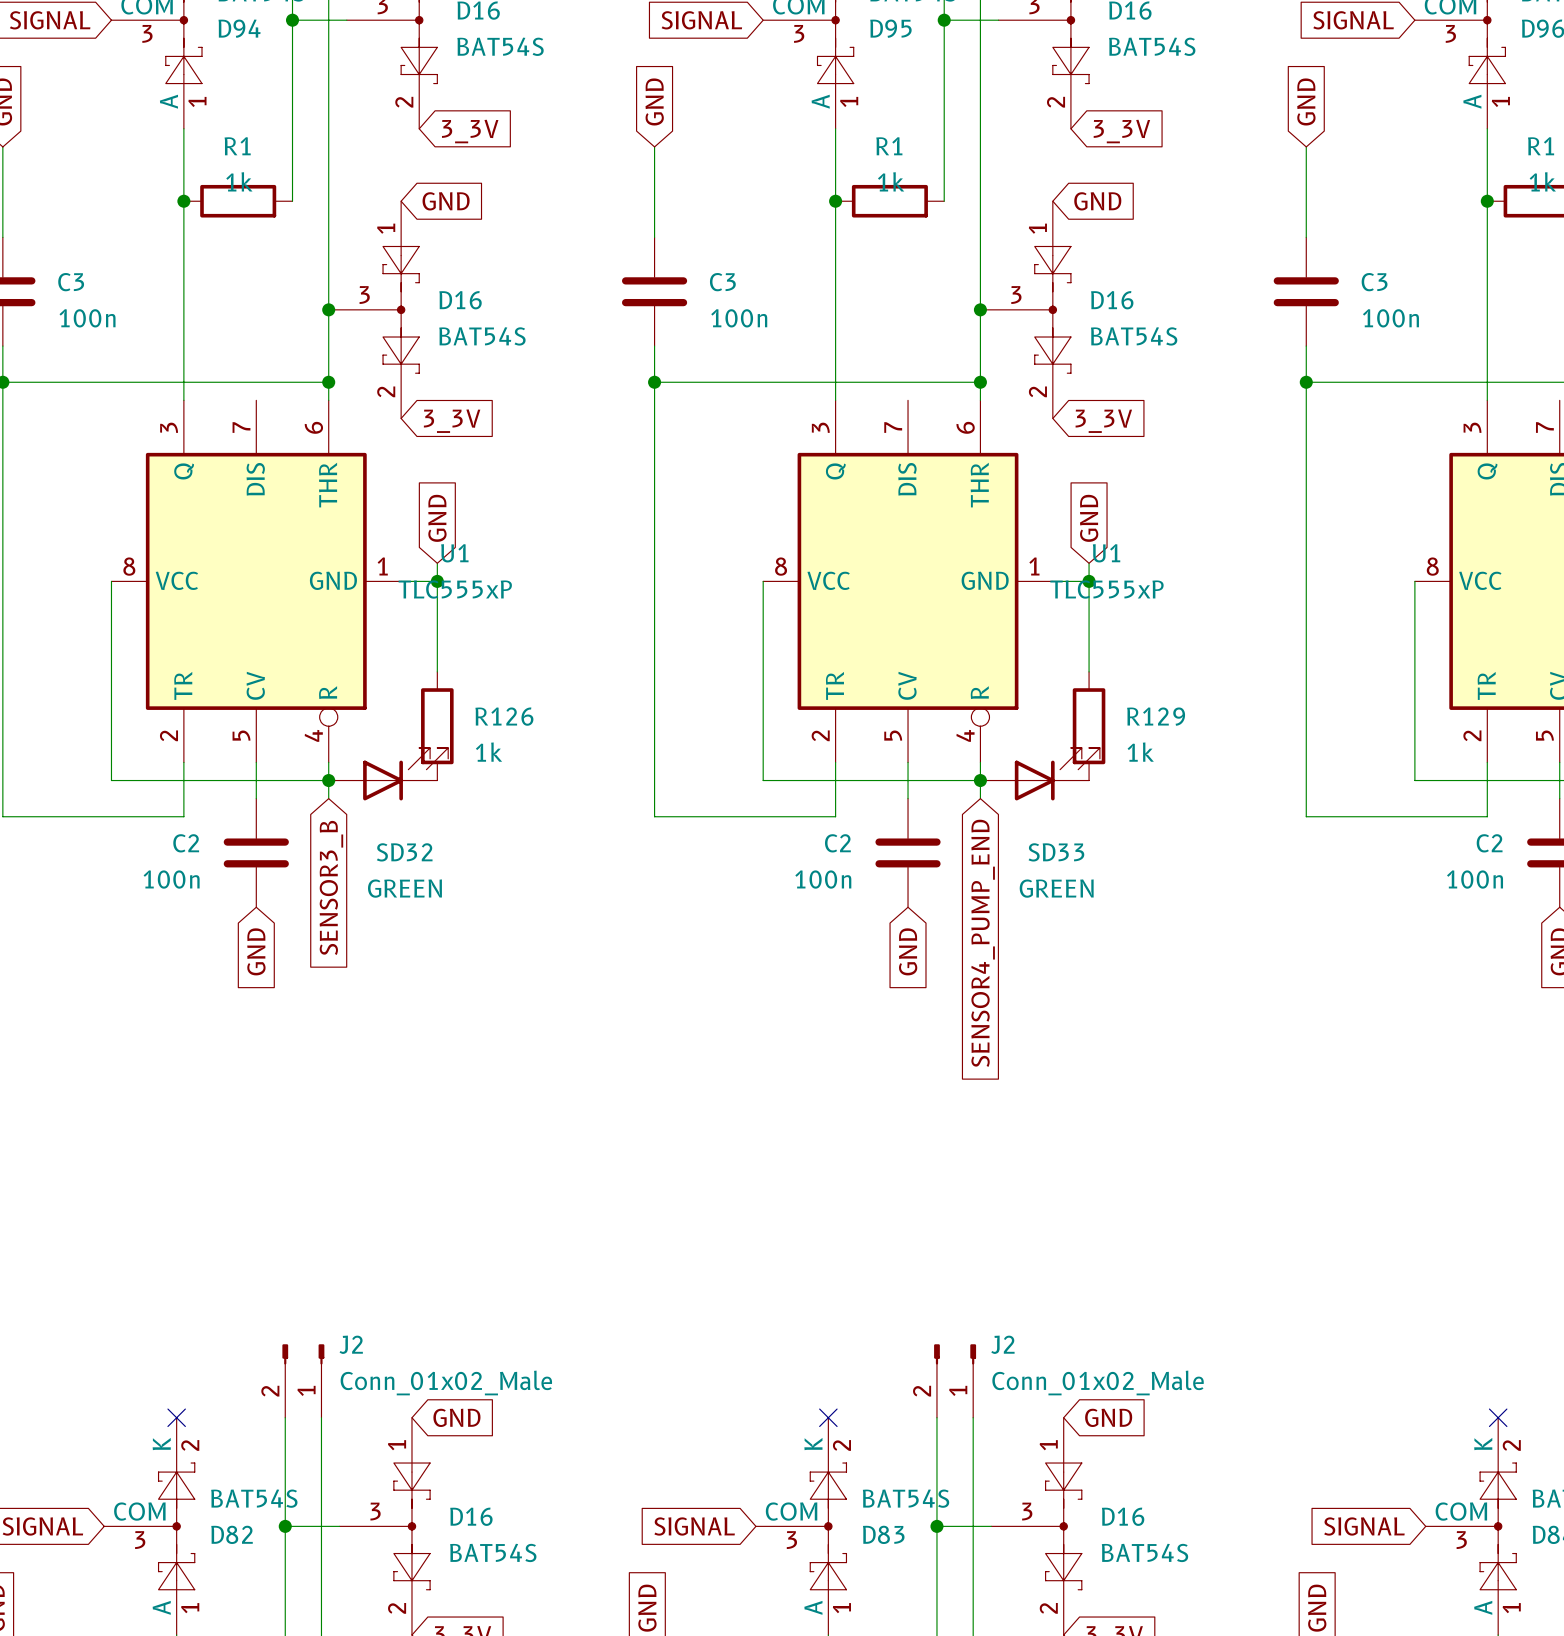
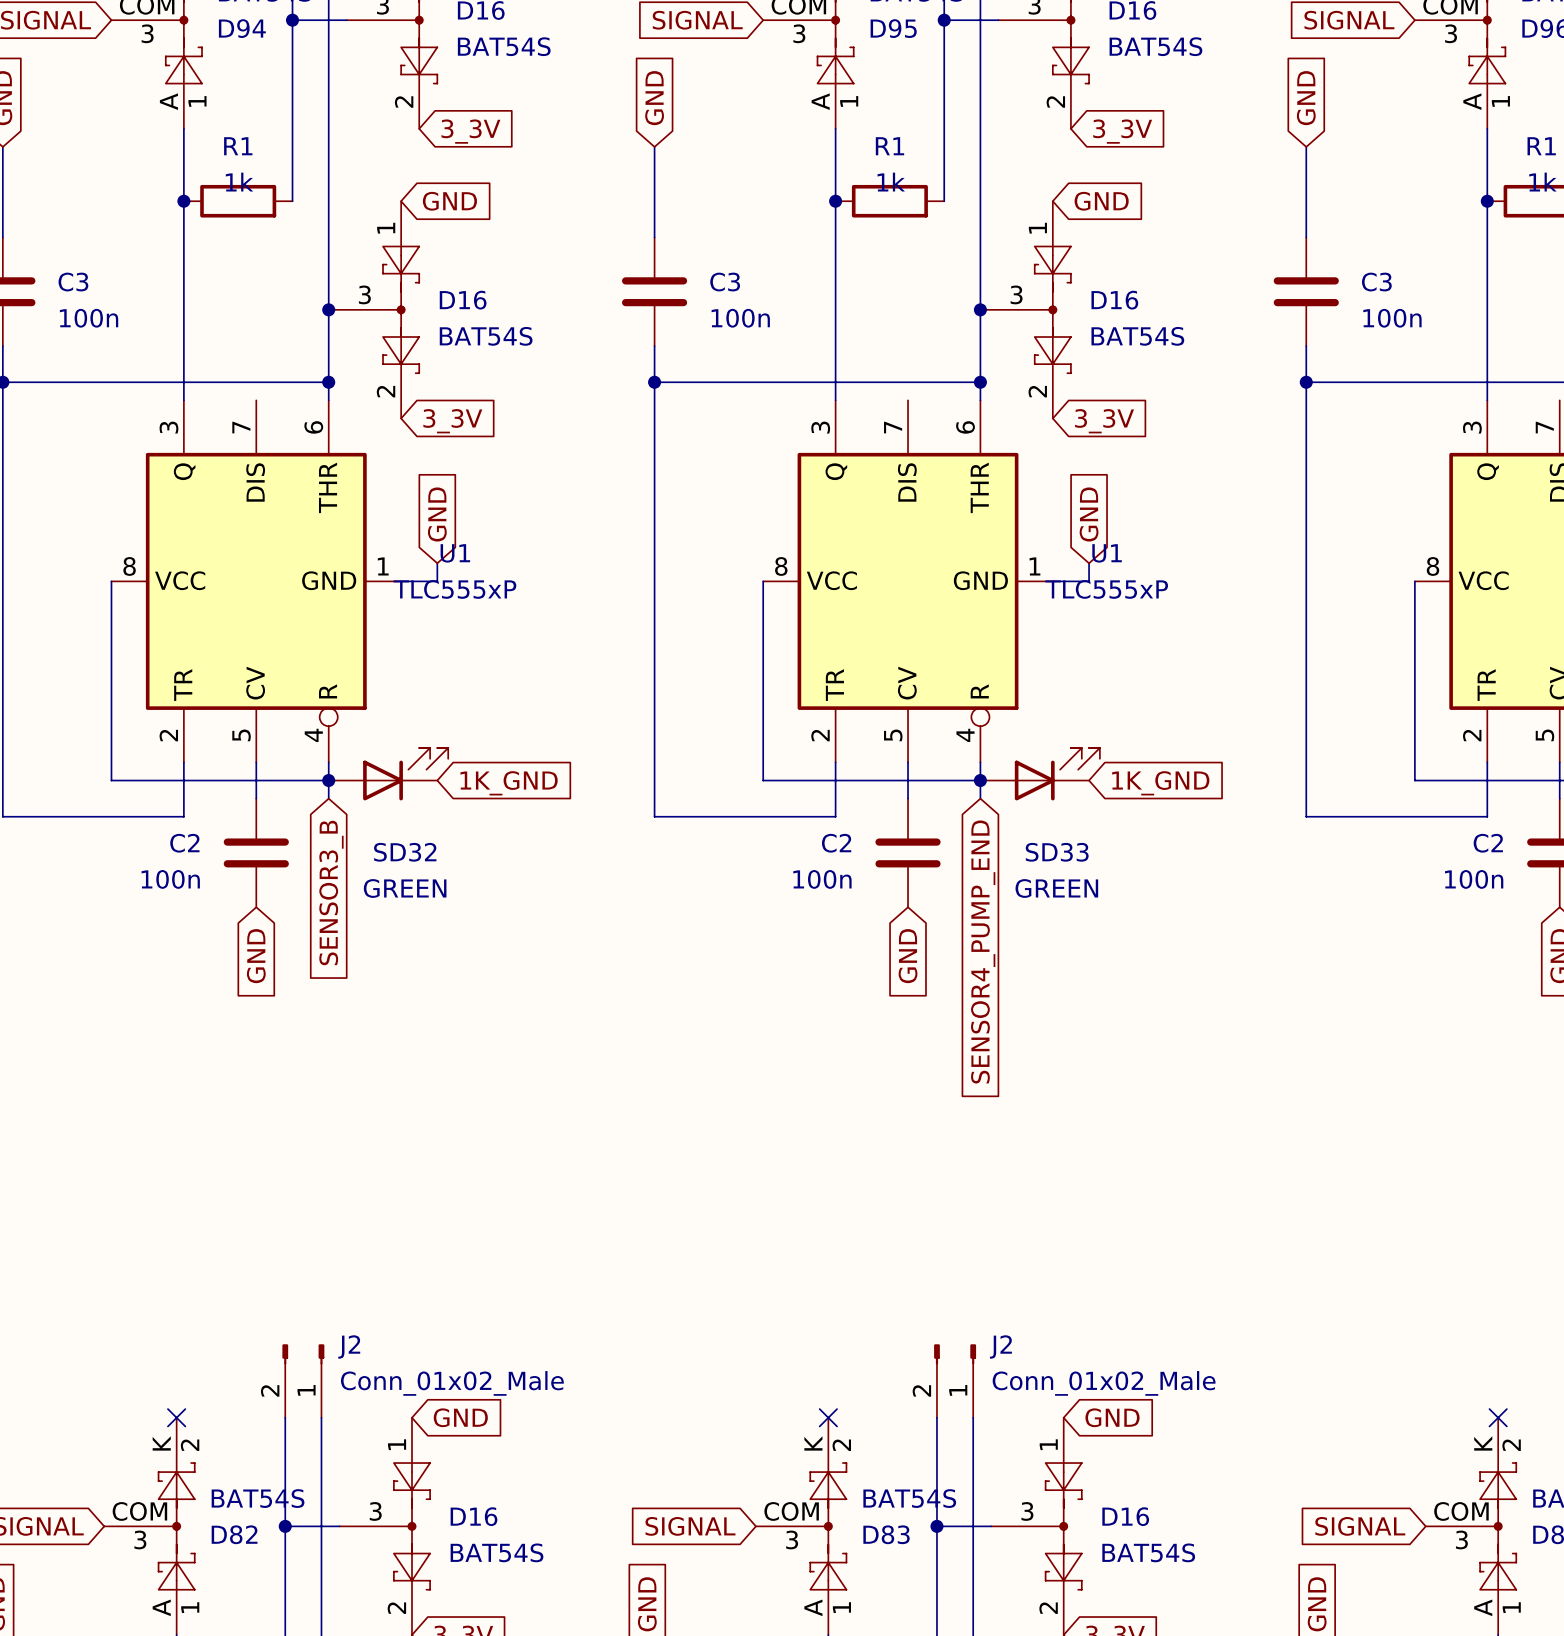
wire: (437, 581) (437, 671) -> none
junction: (437, 581) -> none
wire: (1089, 581) (1089, 671) -> none
junction: (1089, 581) -> none
R126: 1k (437, 726) -> none
R129: 1k (1089, 726) -> none
global label: none -> 1K_GND (509, 783)
global label: none -> 1K_GND (1160, 783)

